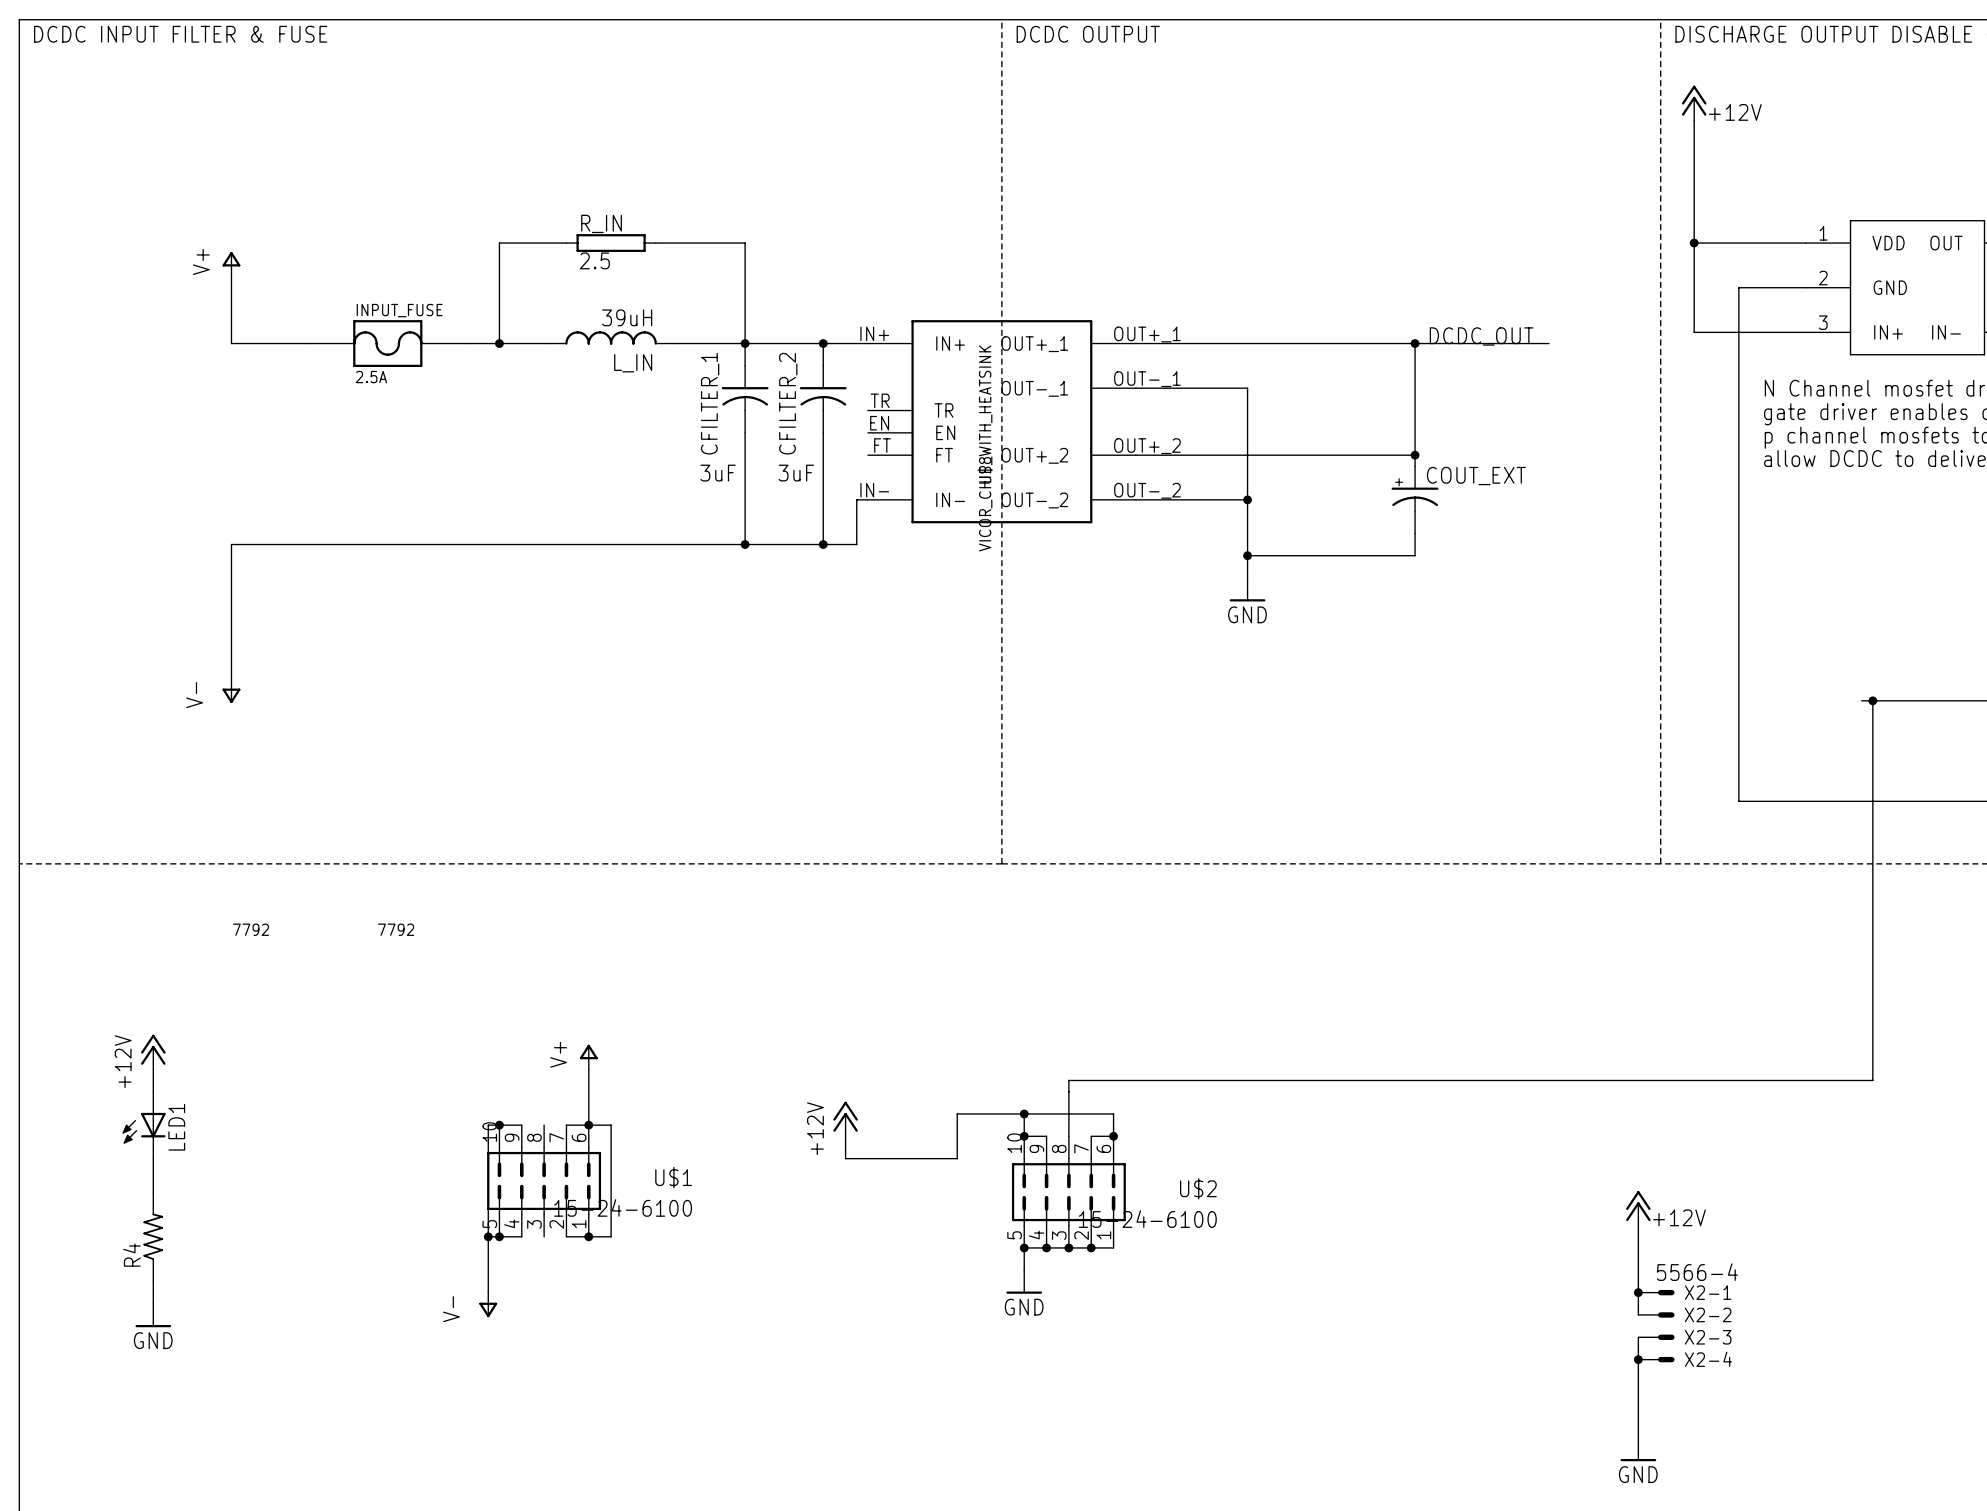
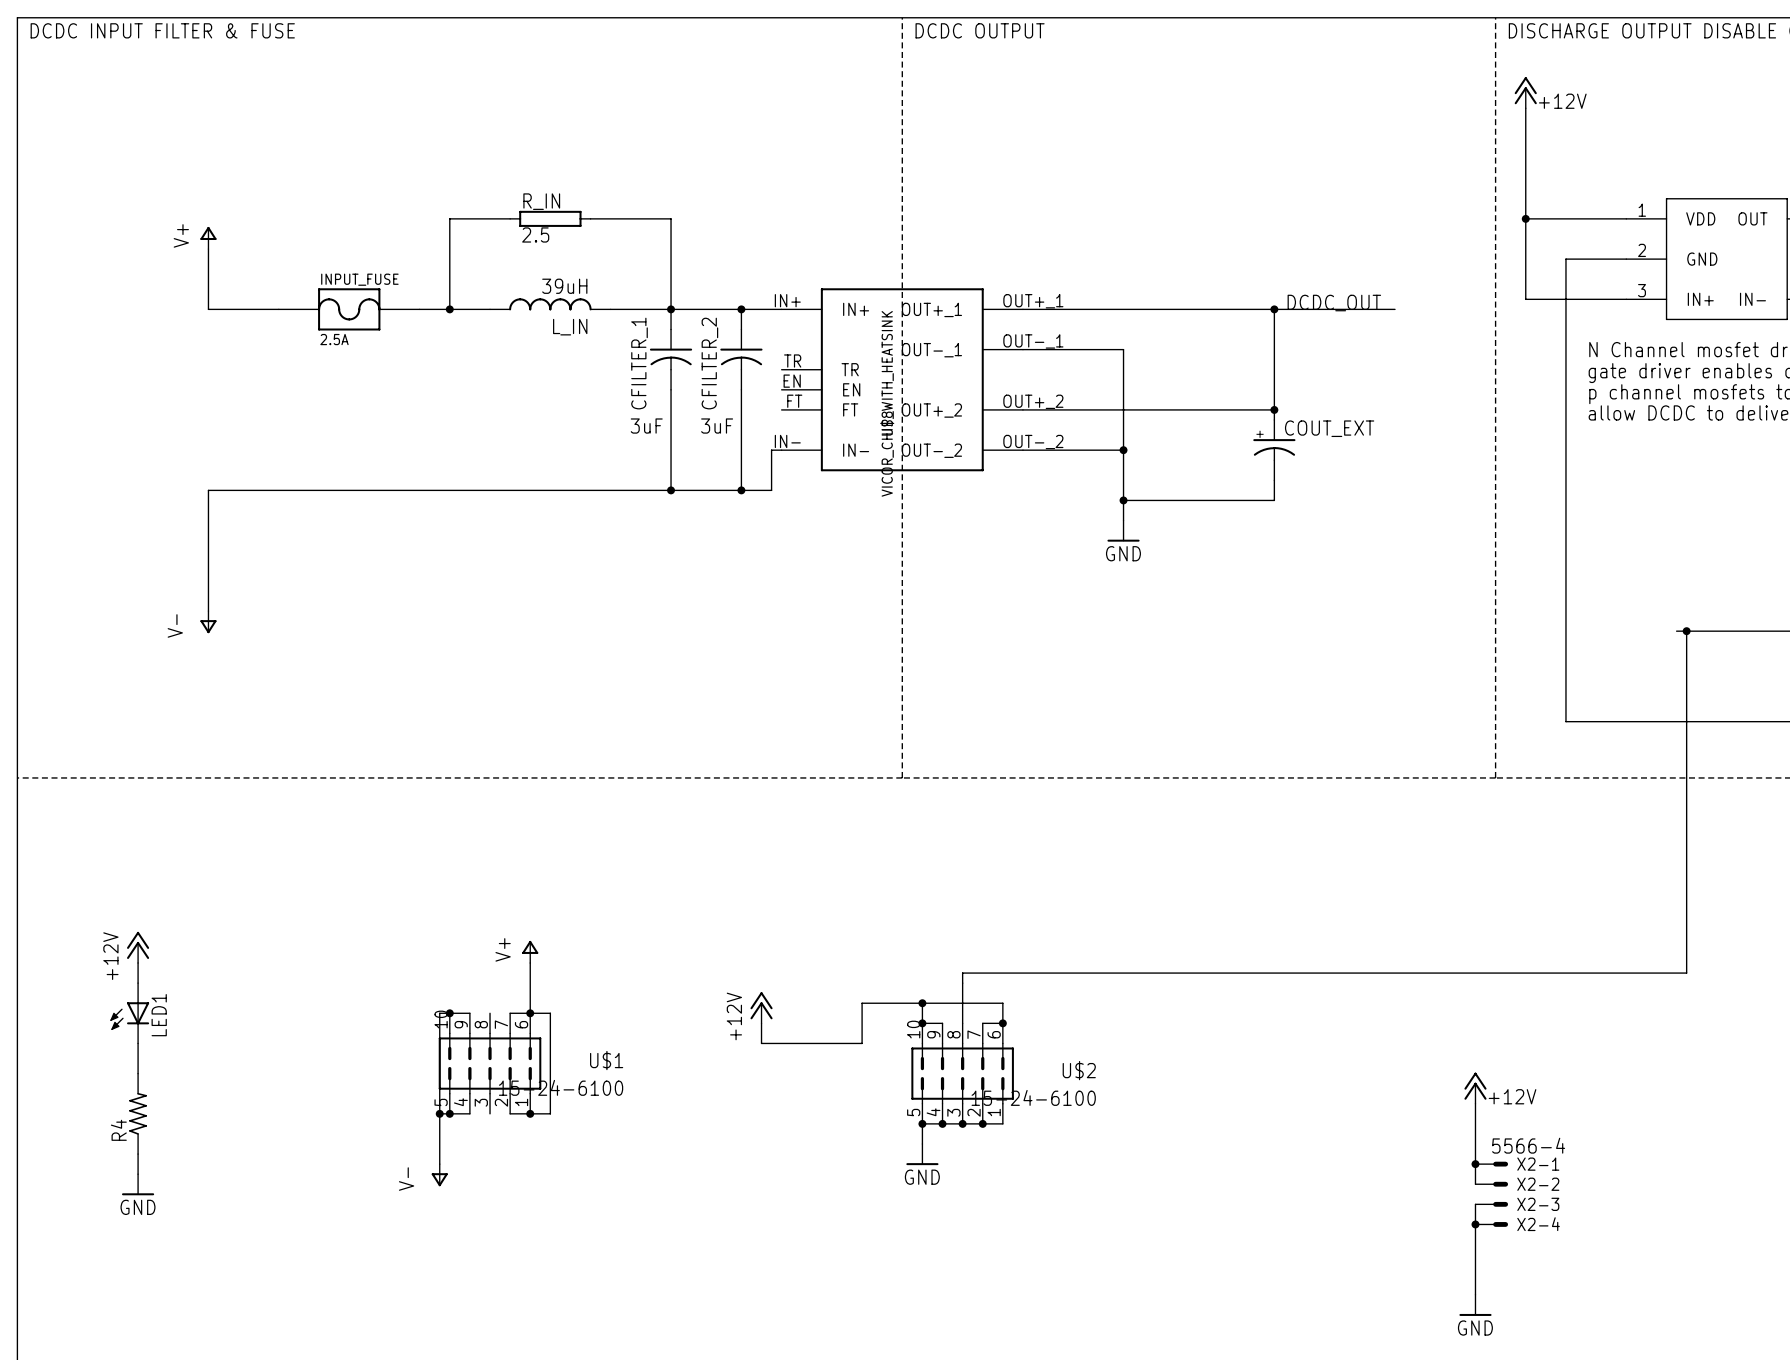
part: (250, 929) -> none
part: (396, 929) -> none

